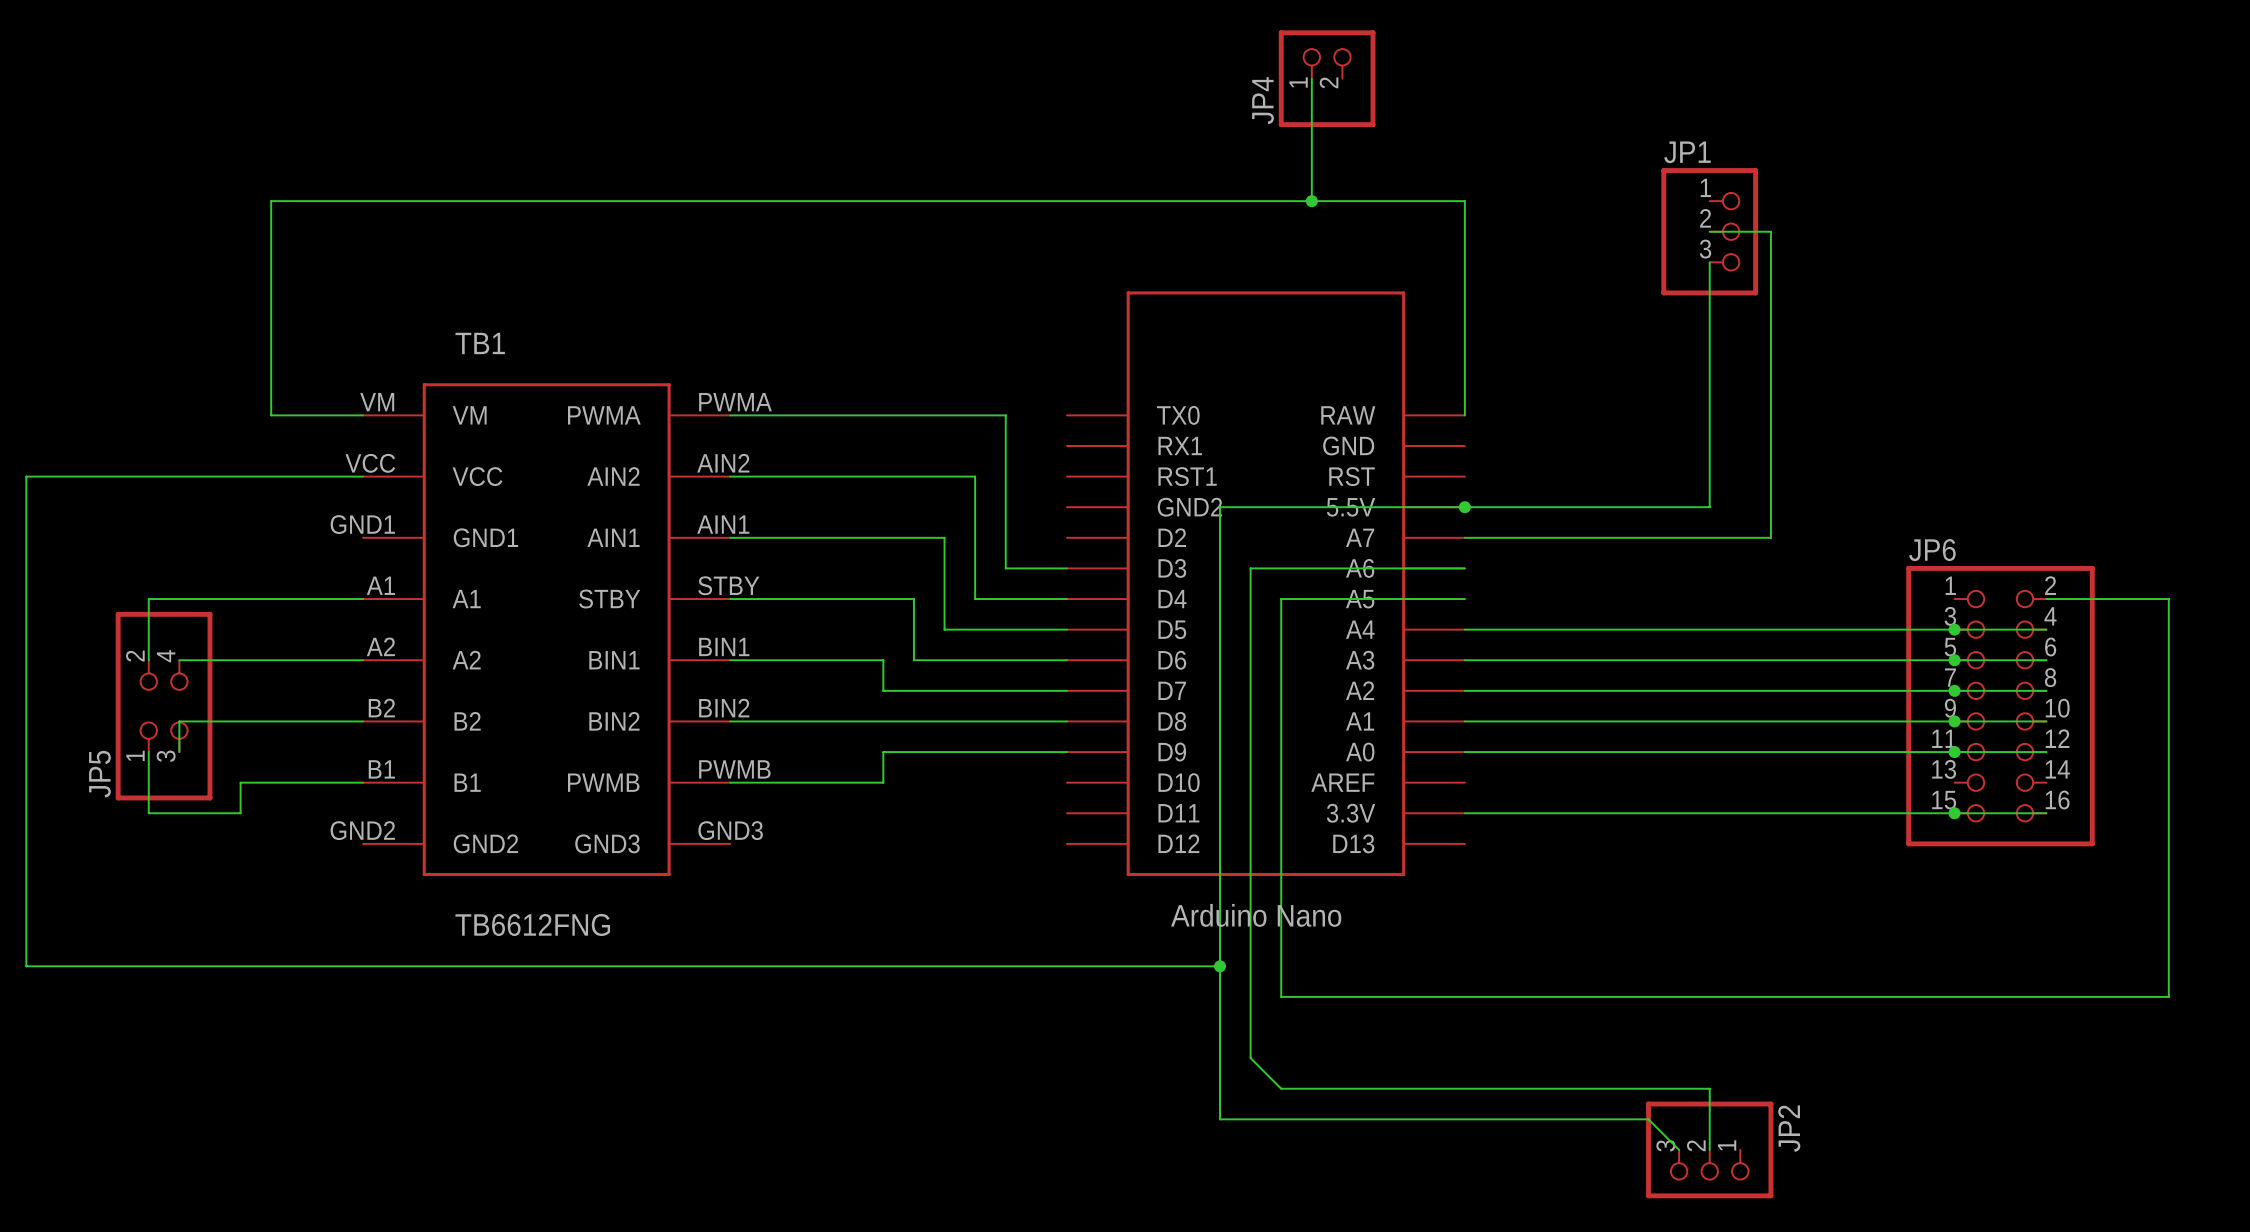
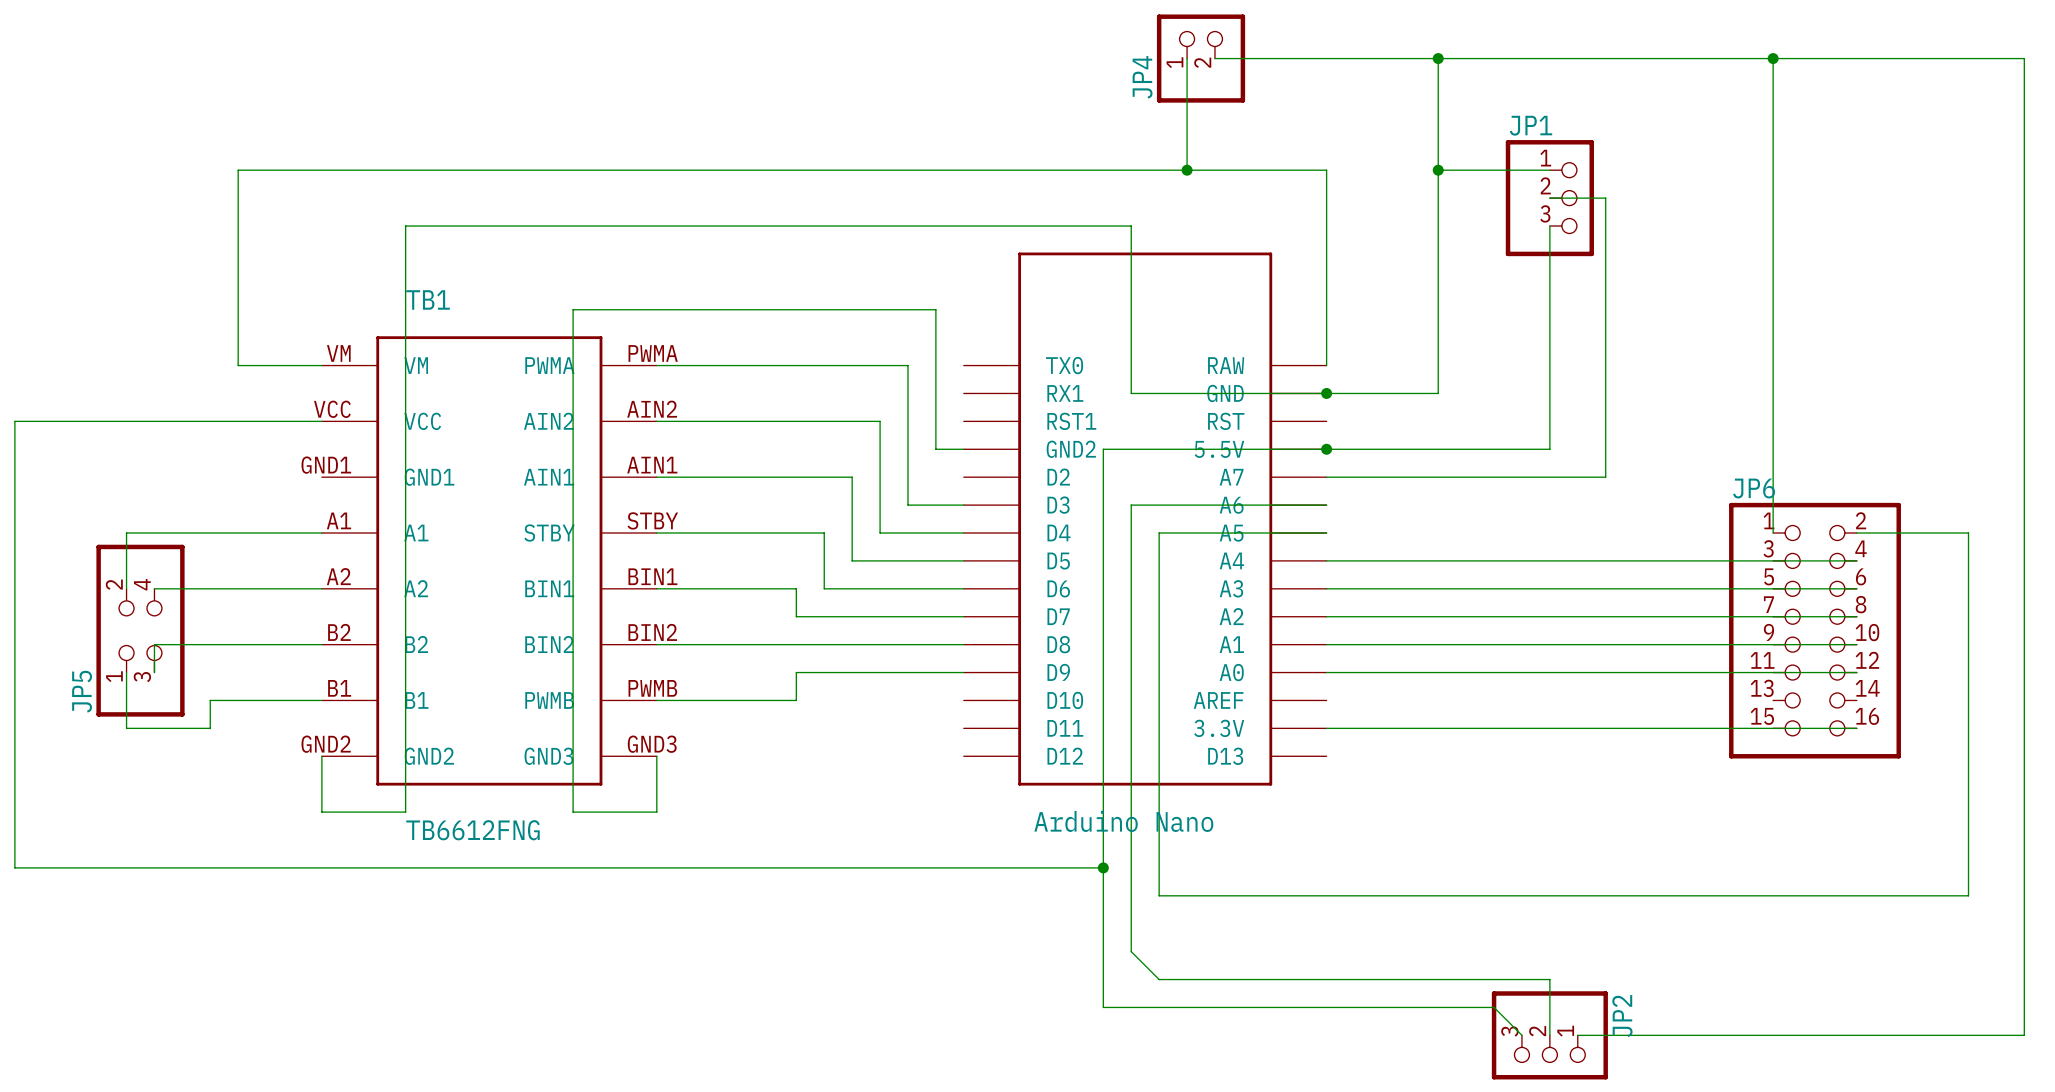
wire: none -> (1214, 58) (2024, 58) (2024, 1035) (1577, 1035)
wire: none -> (1438, 58) (1438, 393) (1131, 393) (1131, 226) (405, 226) (405, 812) (321, 812) (321, 756)
junction: none -> (1438, 58)
wire: none -> (1773, 58) (1773, 533)
junction: none -> (1773, 58)
wire: none -> (1438, 170) (1549, 170)
junction: none -> (1438, 170)
junction: none -> (1326, 393)
wire: none -> (963, 449) (935, 449) (935, 309) (573, 309) (573, 812) (656, 812) (656, 756)
junction: (1954, 629) -> none
junction: (1954, 660) -> none
junction: (1954, 690) -> none
junction: (1954, 721) -> none
junction: (1954, 752) -> none
junction: (1954, 813) -> none

